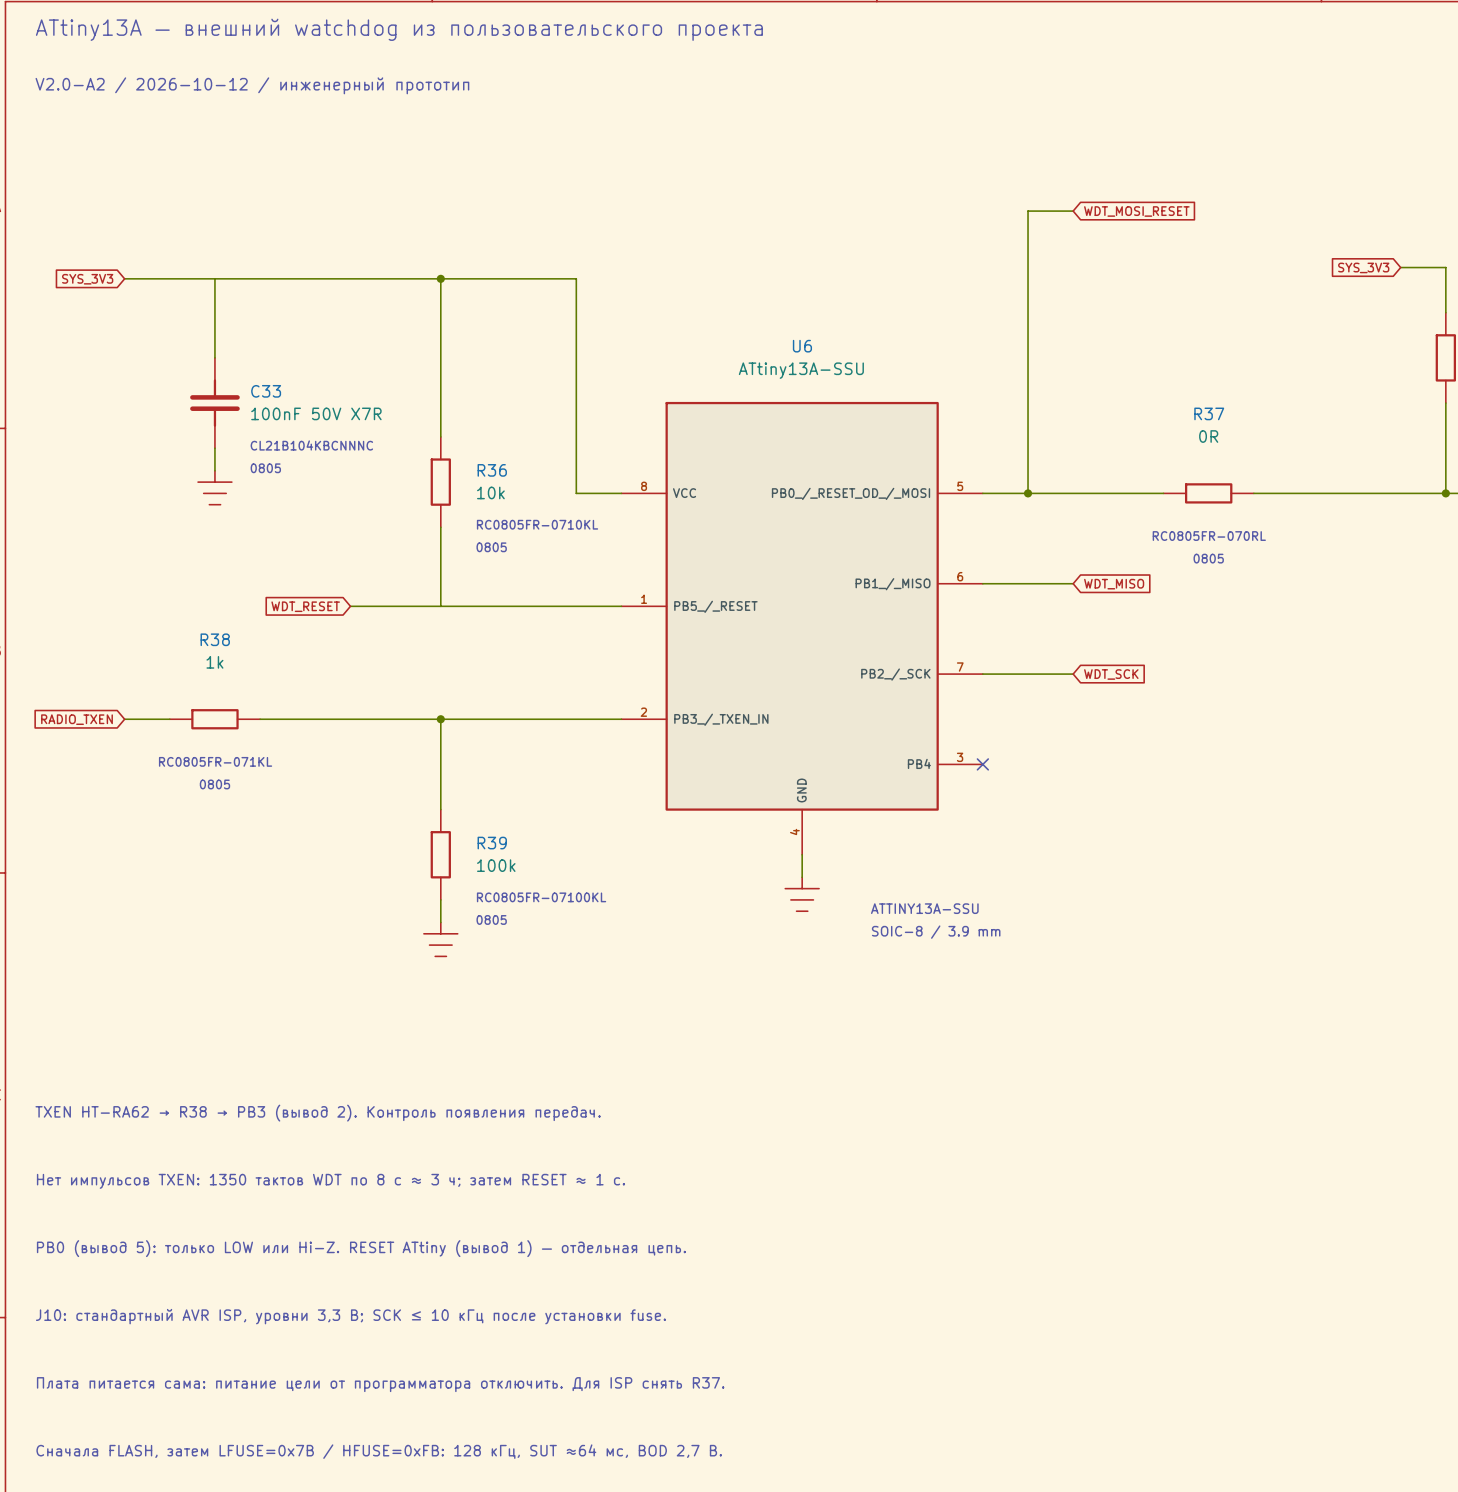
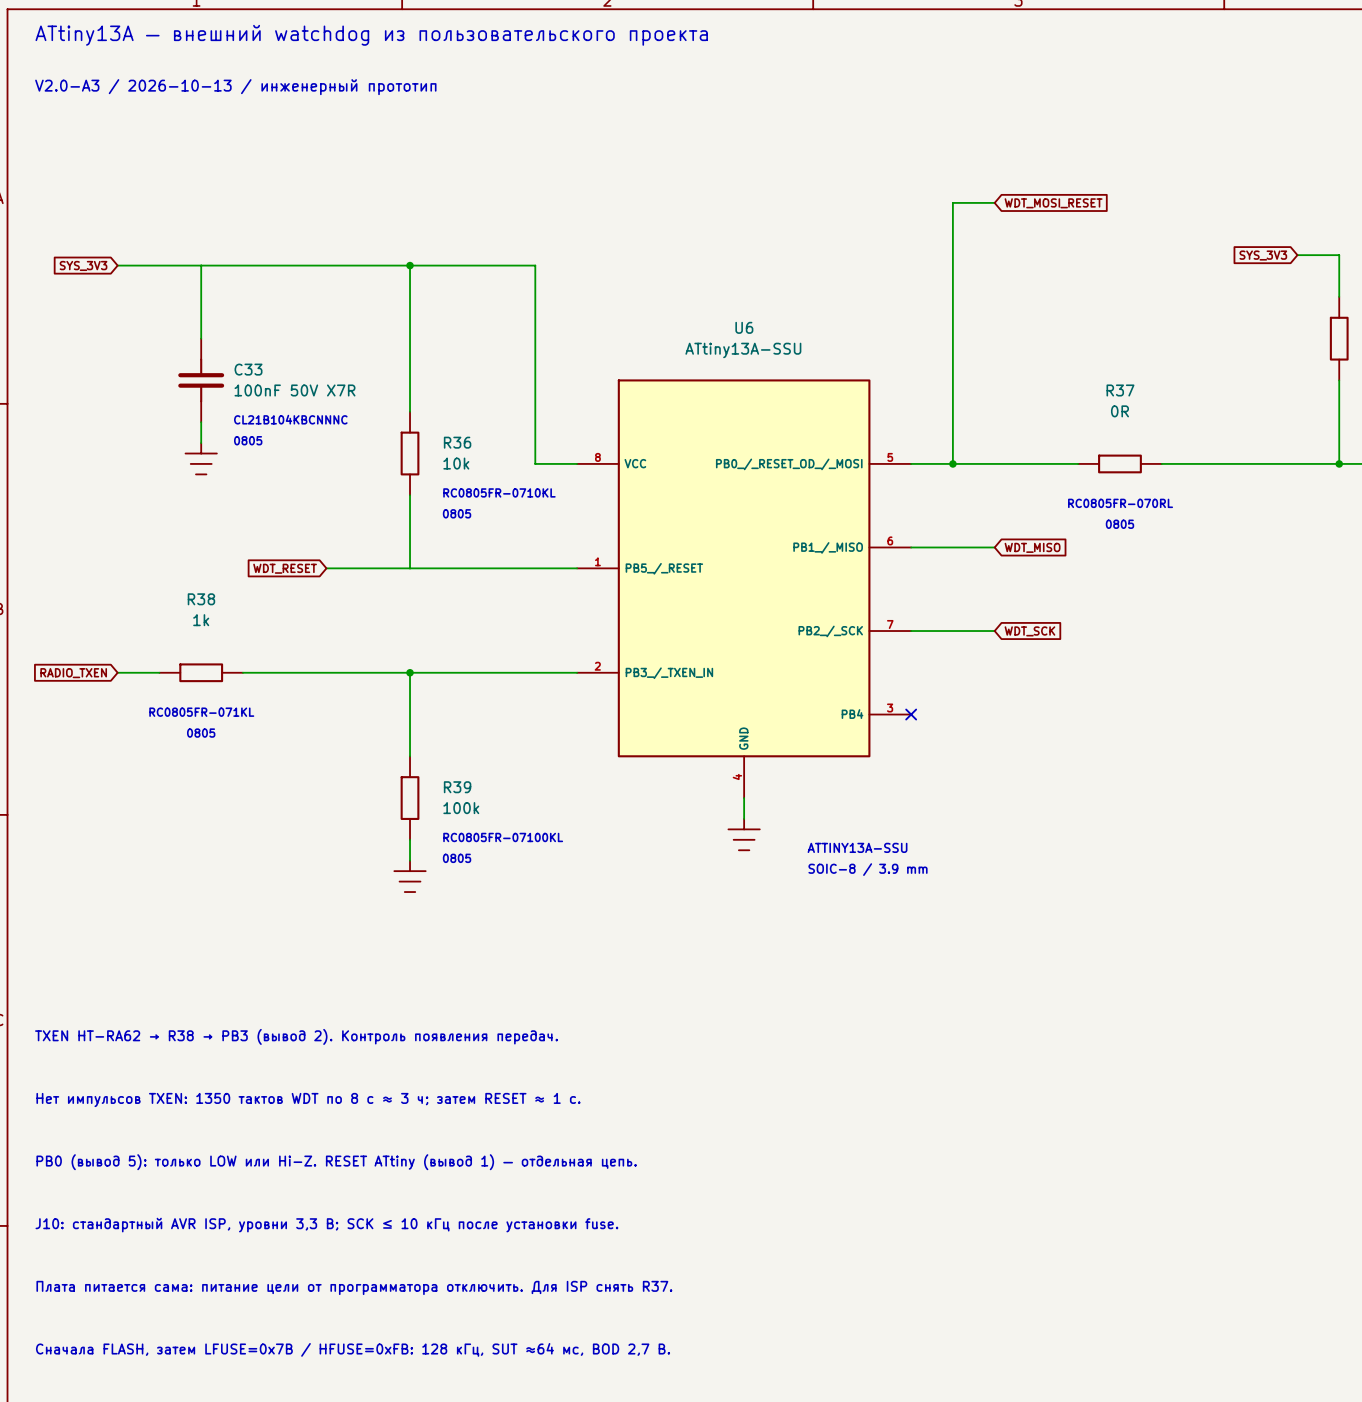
text: V2.0-A2 / 2026-10-12 / инженерный прототип (252, 85) -> V2.0-A3 / 2026-10-13 / инженерный прототип (235, 87)

